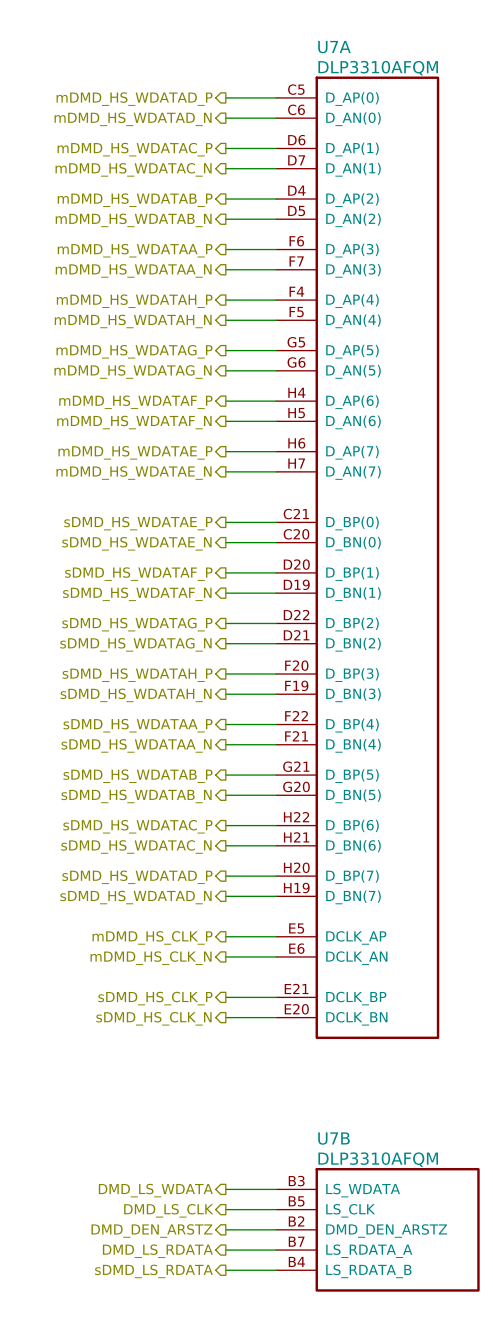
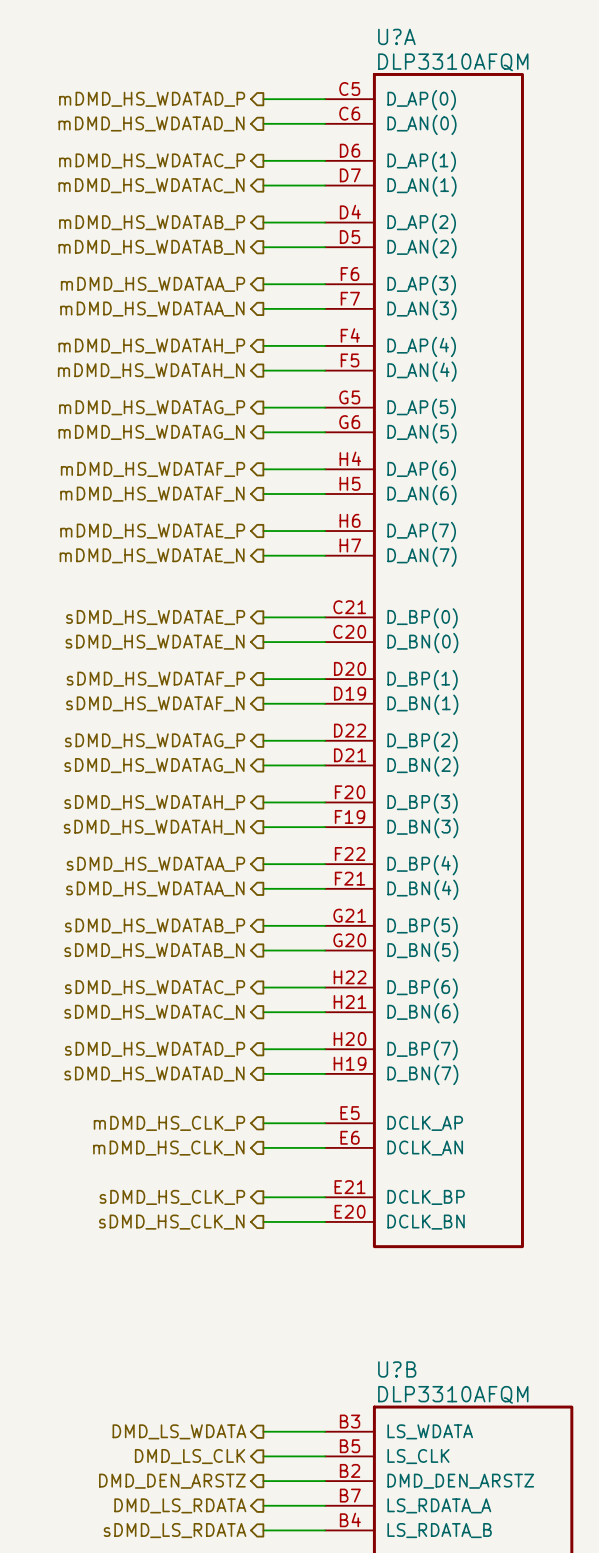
U7A name: U7A (334, 47) -> U?A (396, 36)
U7B name: U7B (333, 1138) -> U?B (397, 1369)

